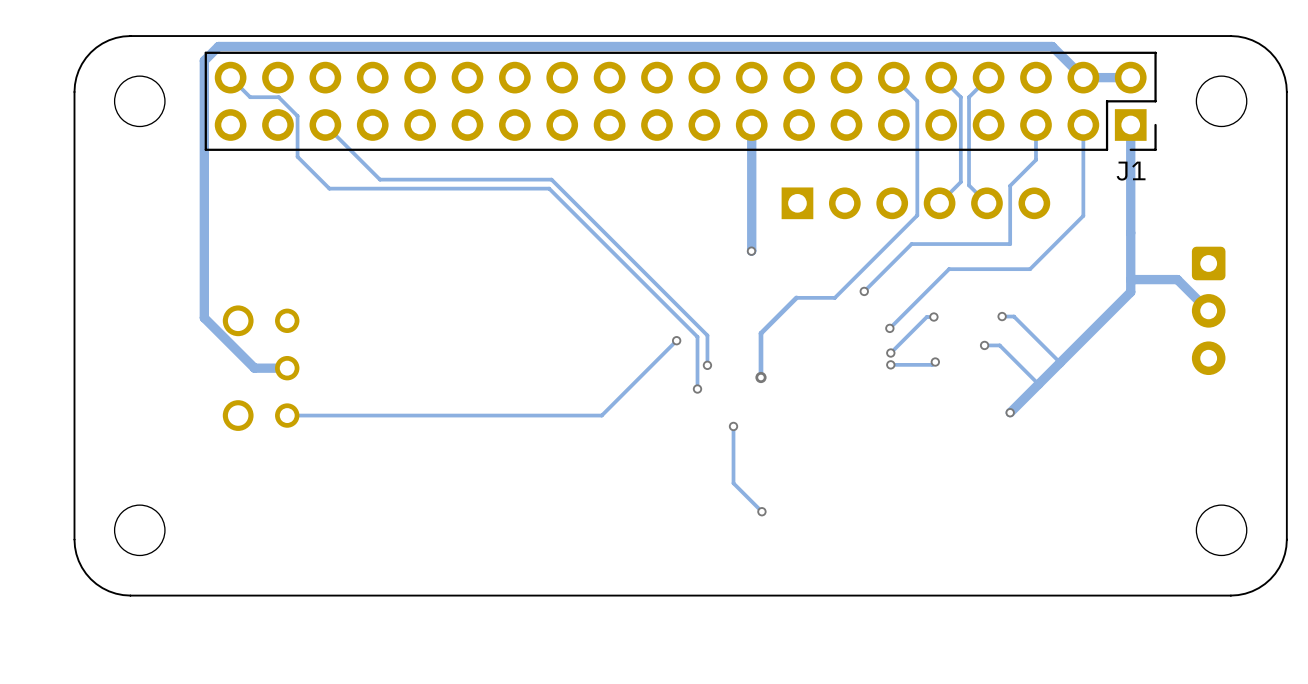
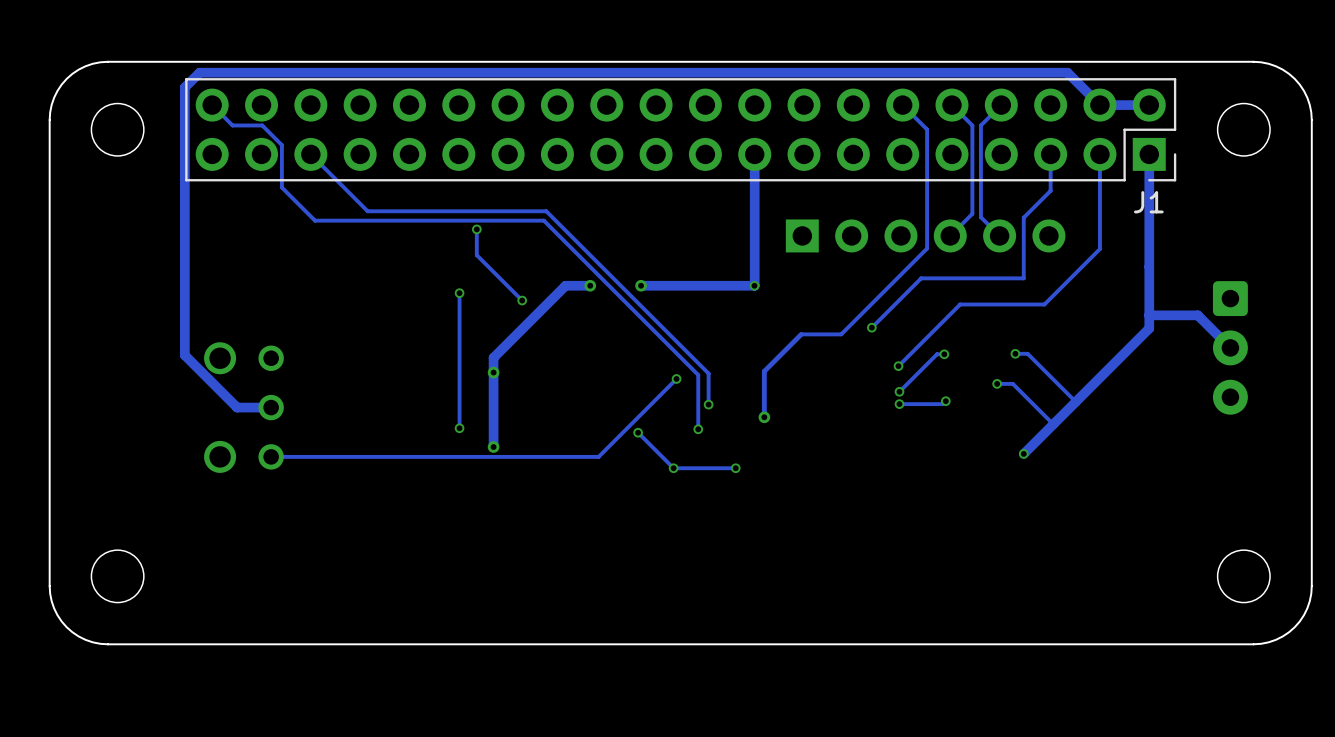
track: none -> (476, 229) (476, 255) (522, 300)
via: none -> (476, 229)
track: none -> (590, 285) (565, 285) (493, 357) (493, 447)
via: none -> (590, 285)
via: none -> (641, 285)
track: none -> (754, 285) (641, 285)
track: none -> (459, 293) (459, 428)
via: none -> (459, 293)
via: none -> (522, 300)
via: none -> (493, 372)
via: none -> (459, 428)
via: none -> (638, 432)
via: none -> (493, 447)
via: none -> (673, 468)
track: (733, 426) (733, 483) (761, 511) -> (735, 468) (673, 468) (638, 432)
via: (761, 511) -> none

